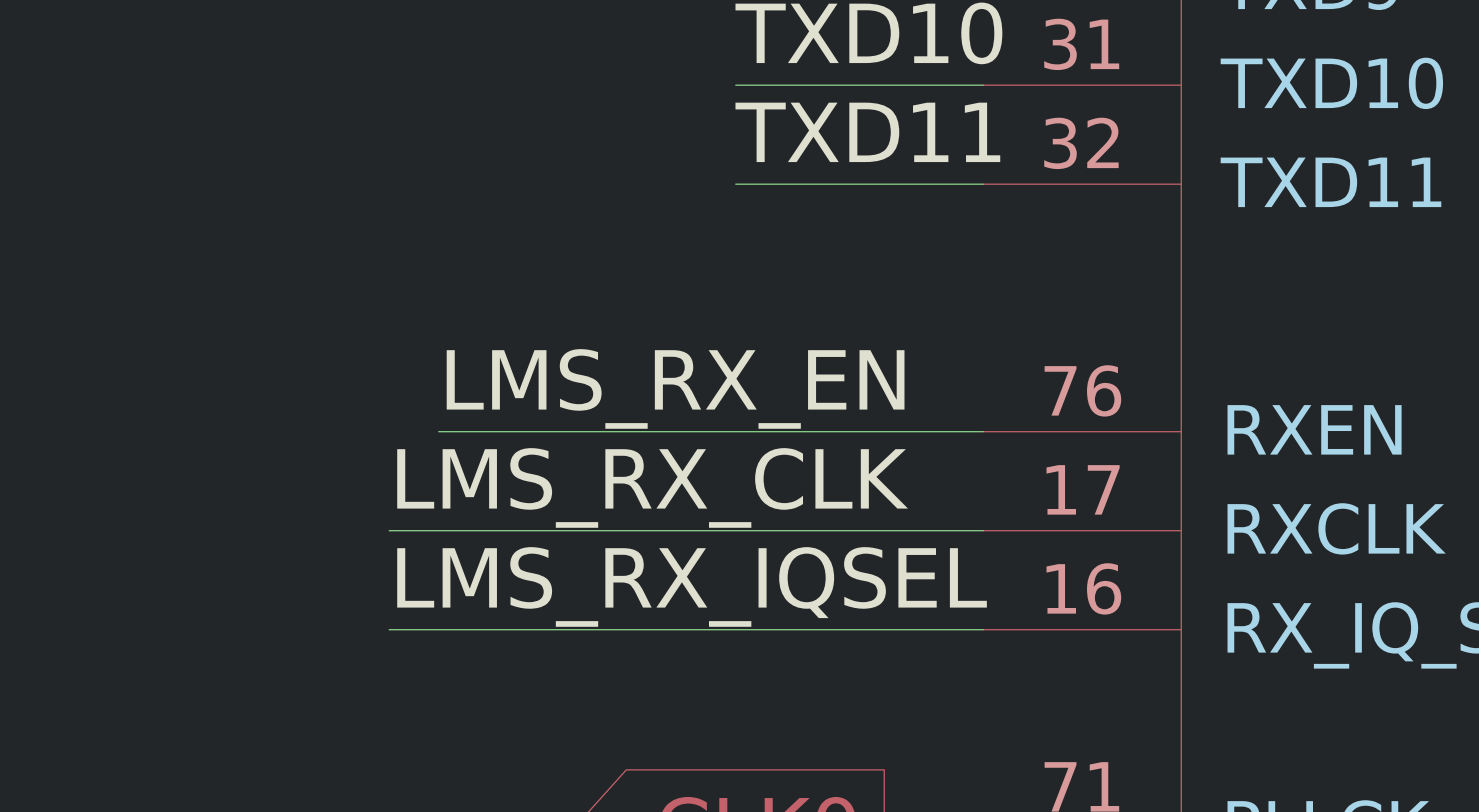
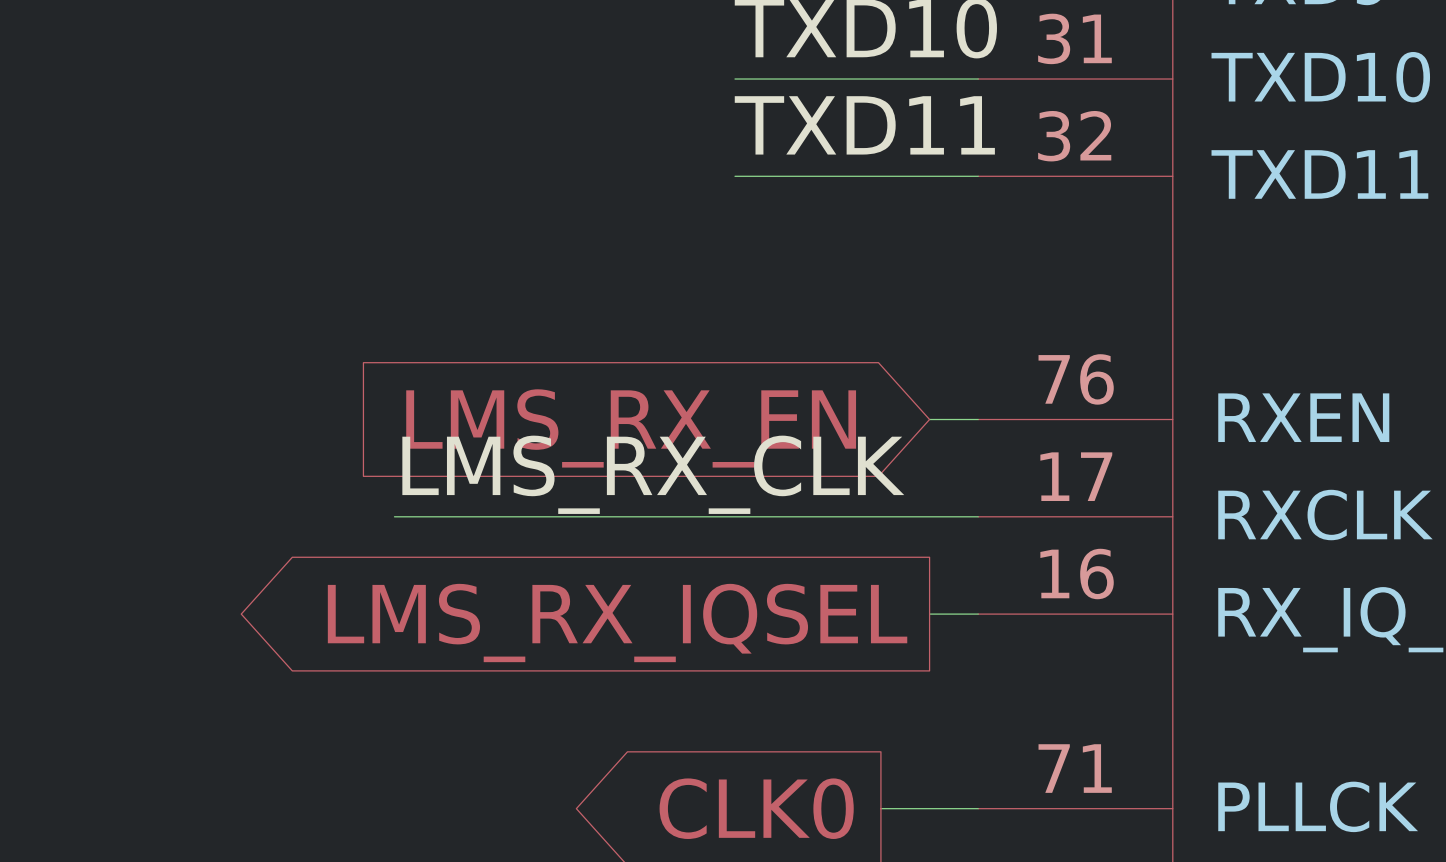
label: LMS_RX_EN (675, 388) -> none
wire: (438, 431) (933, 431) -> none
global label: none -> LMS_RX_EN (631, 428)
label: LMS_RX_IQSEL (692, 586) -> none
wire: (389, 629) (933, 629) -> none
global label: none -> LMS_RX_IQSEL (617, 623)

